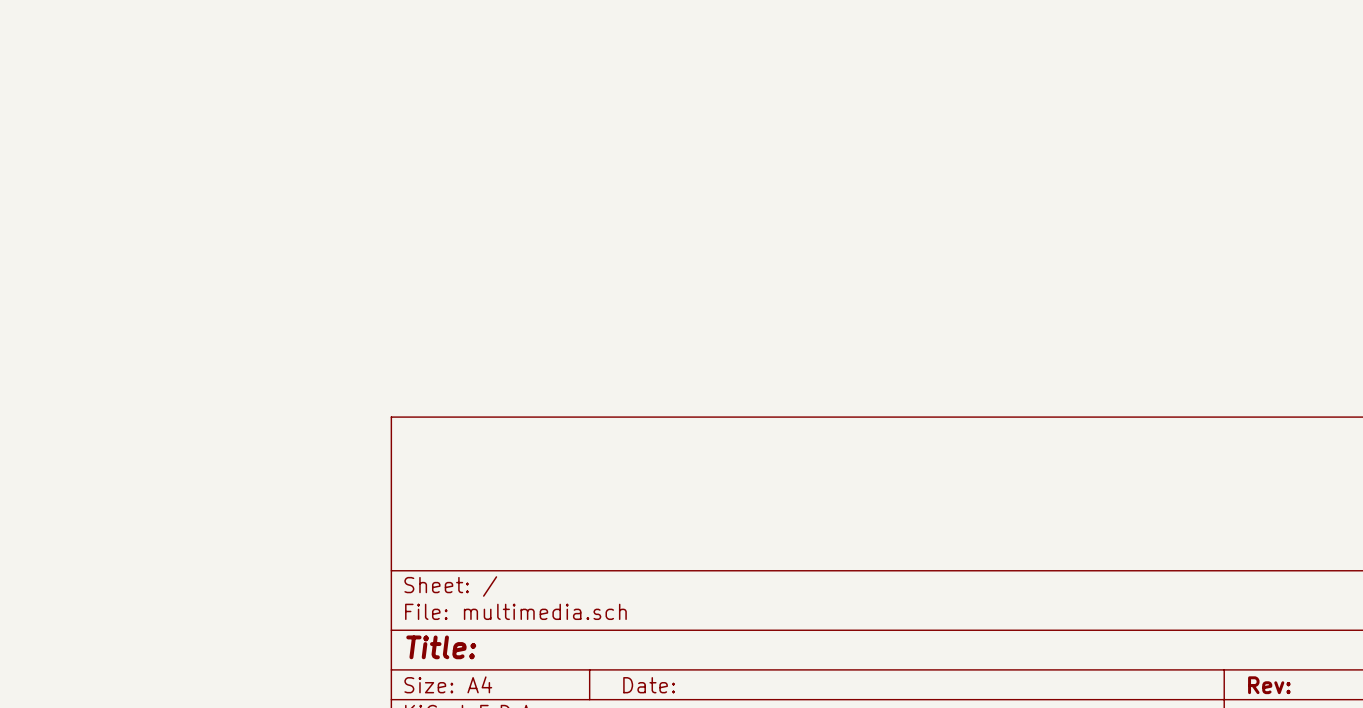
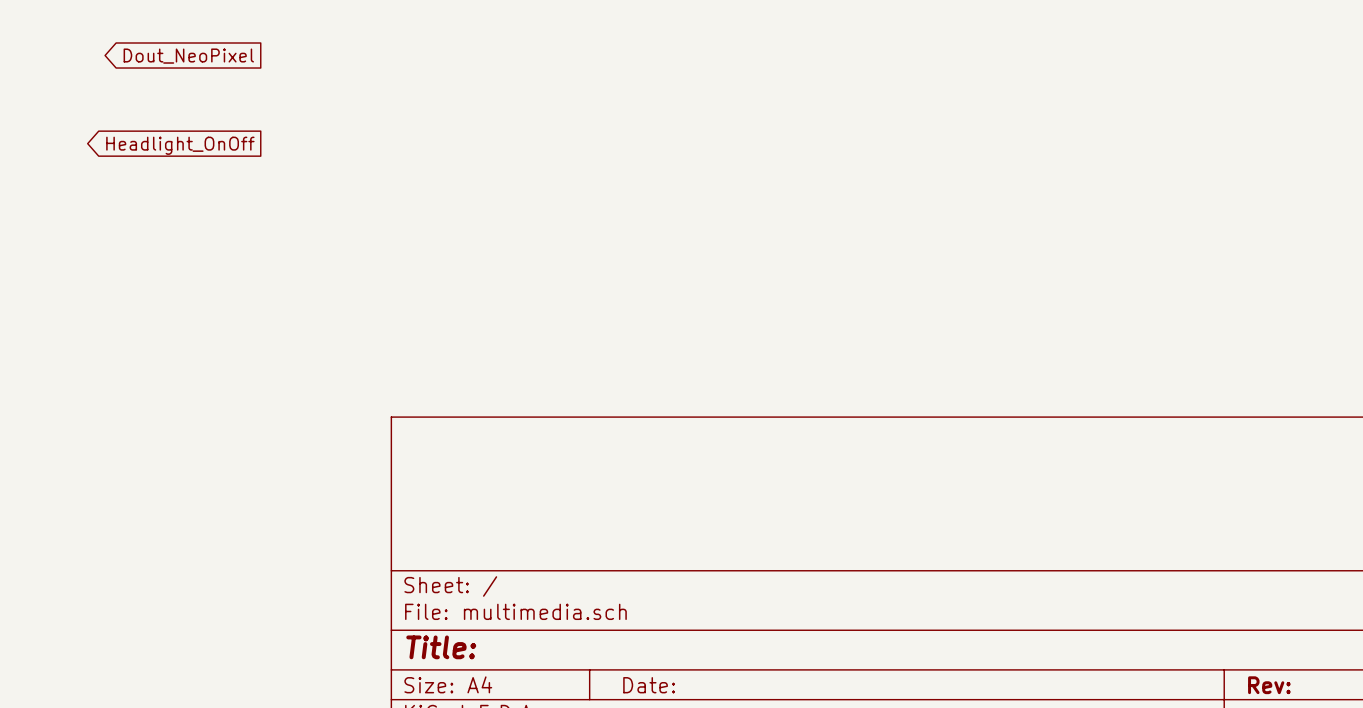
global label: none -> Dout_NeoPixel (188, 56)
global label: none -> Headlight_OnOff (180, 145)

